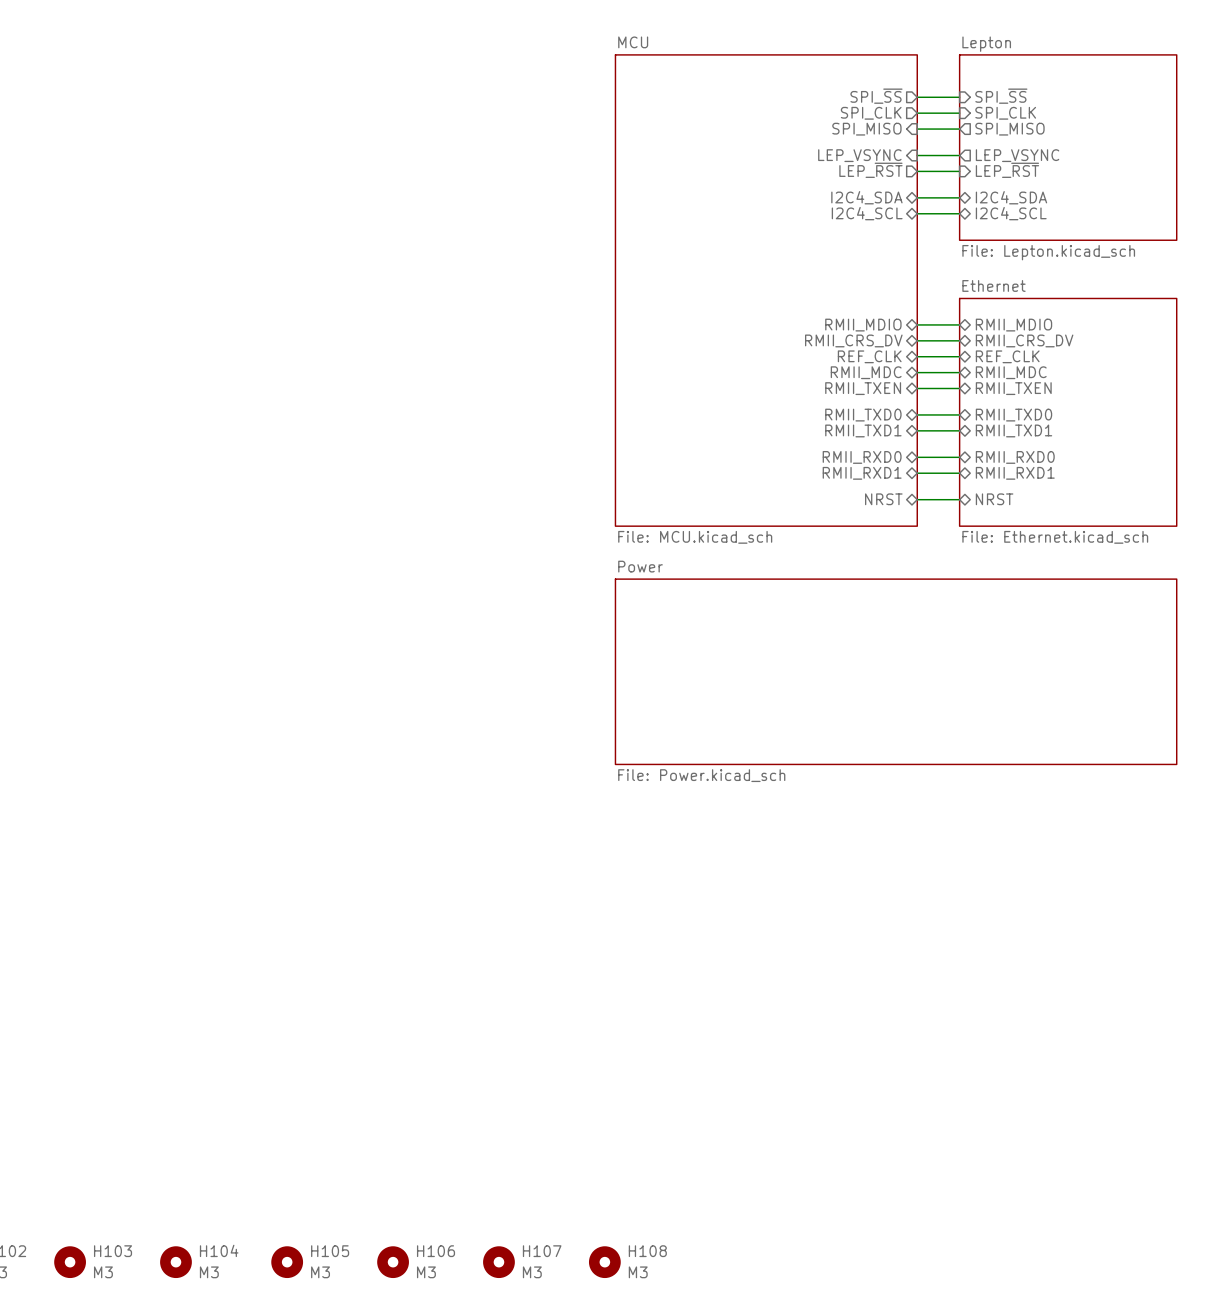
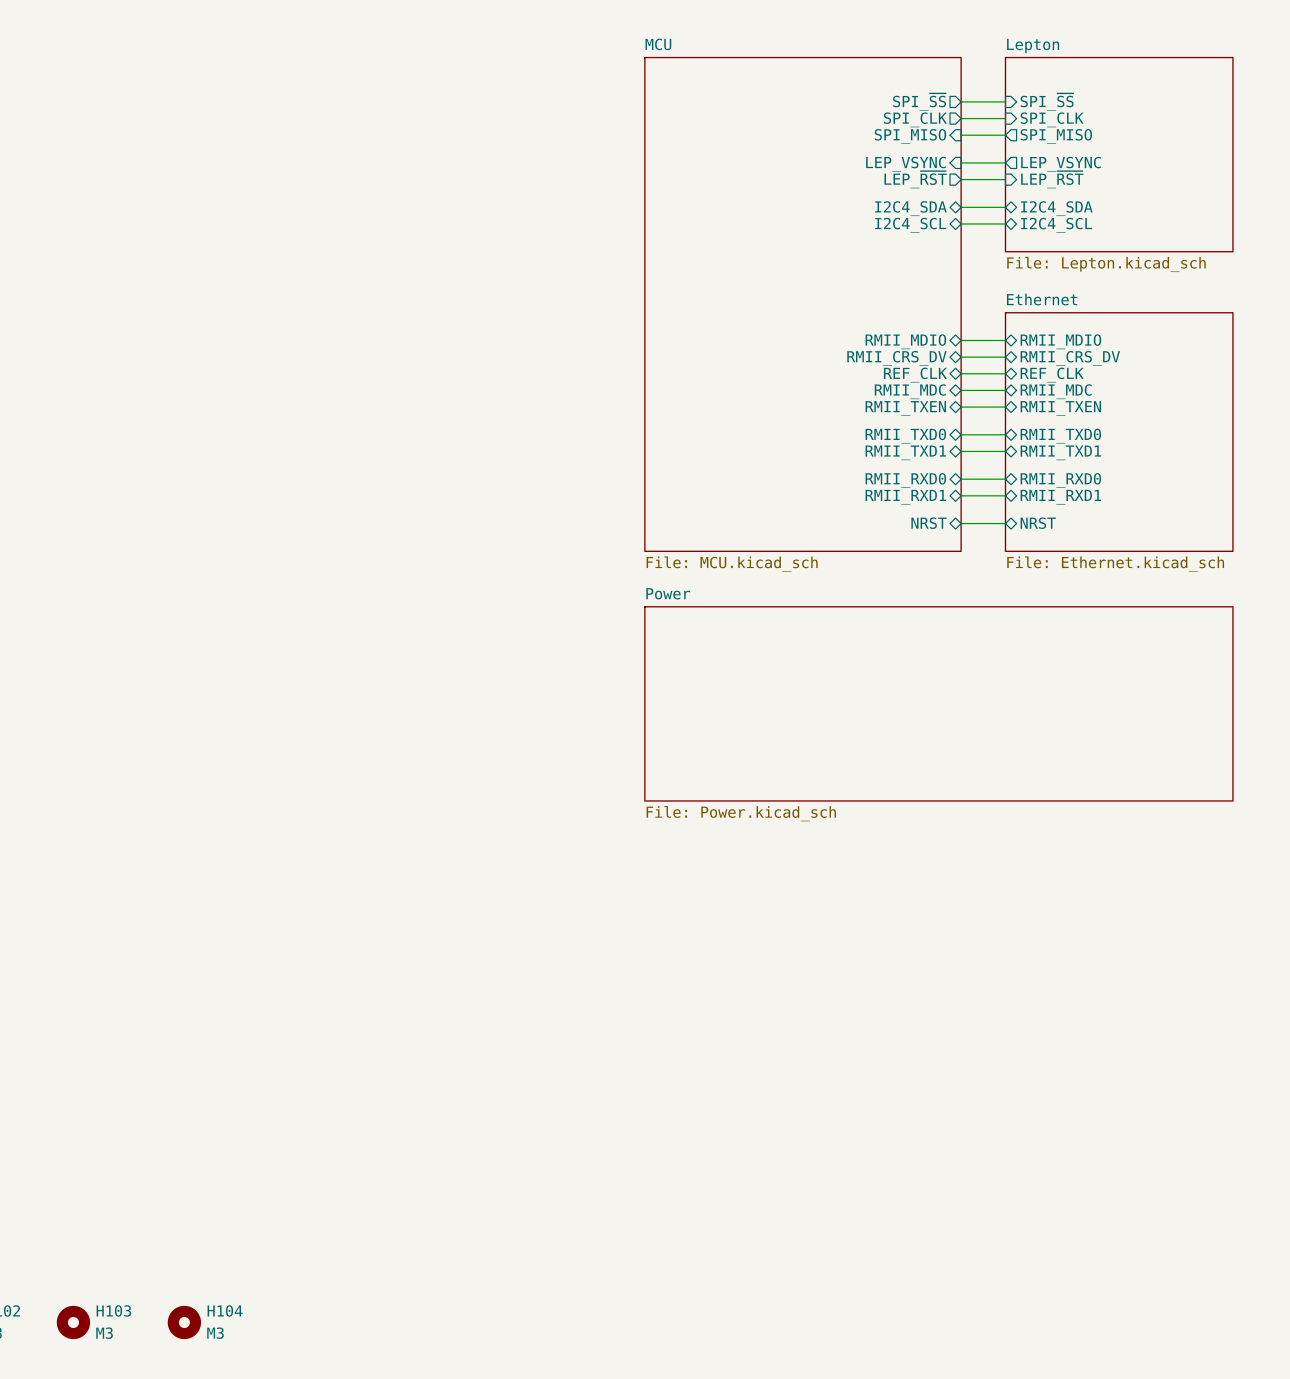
H105: M3 (287, 1262) -> none
H106: M3 (393, 1262) -> none
H107: M3 (498, 1262) -> none
H108: M3 (604, 1262) -> none

